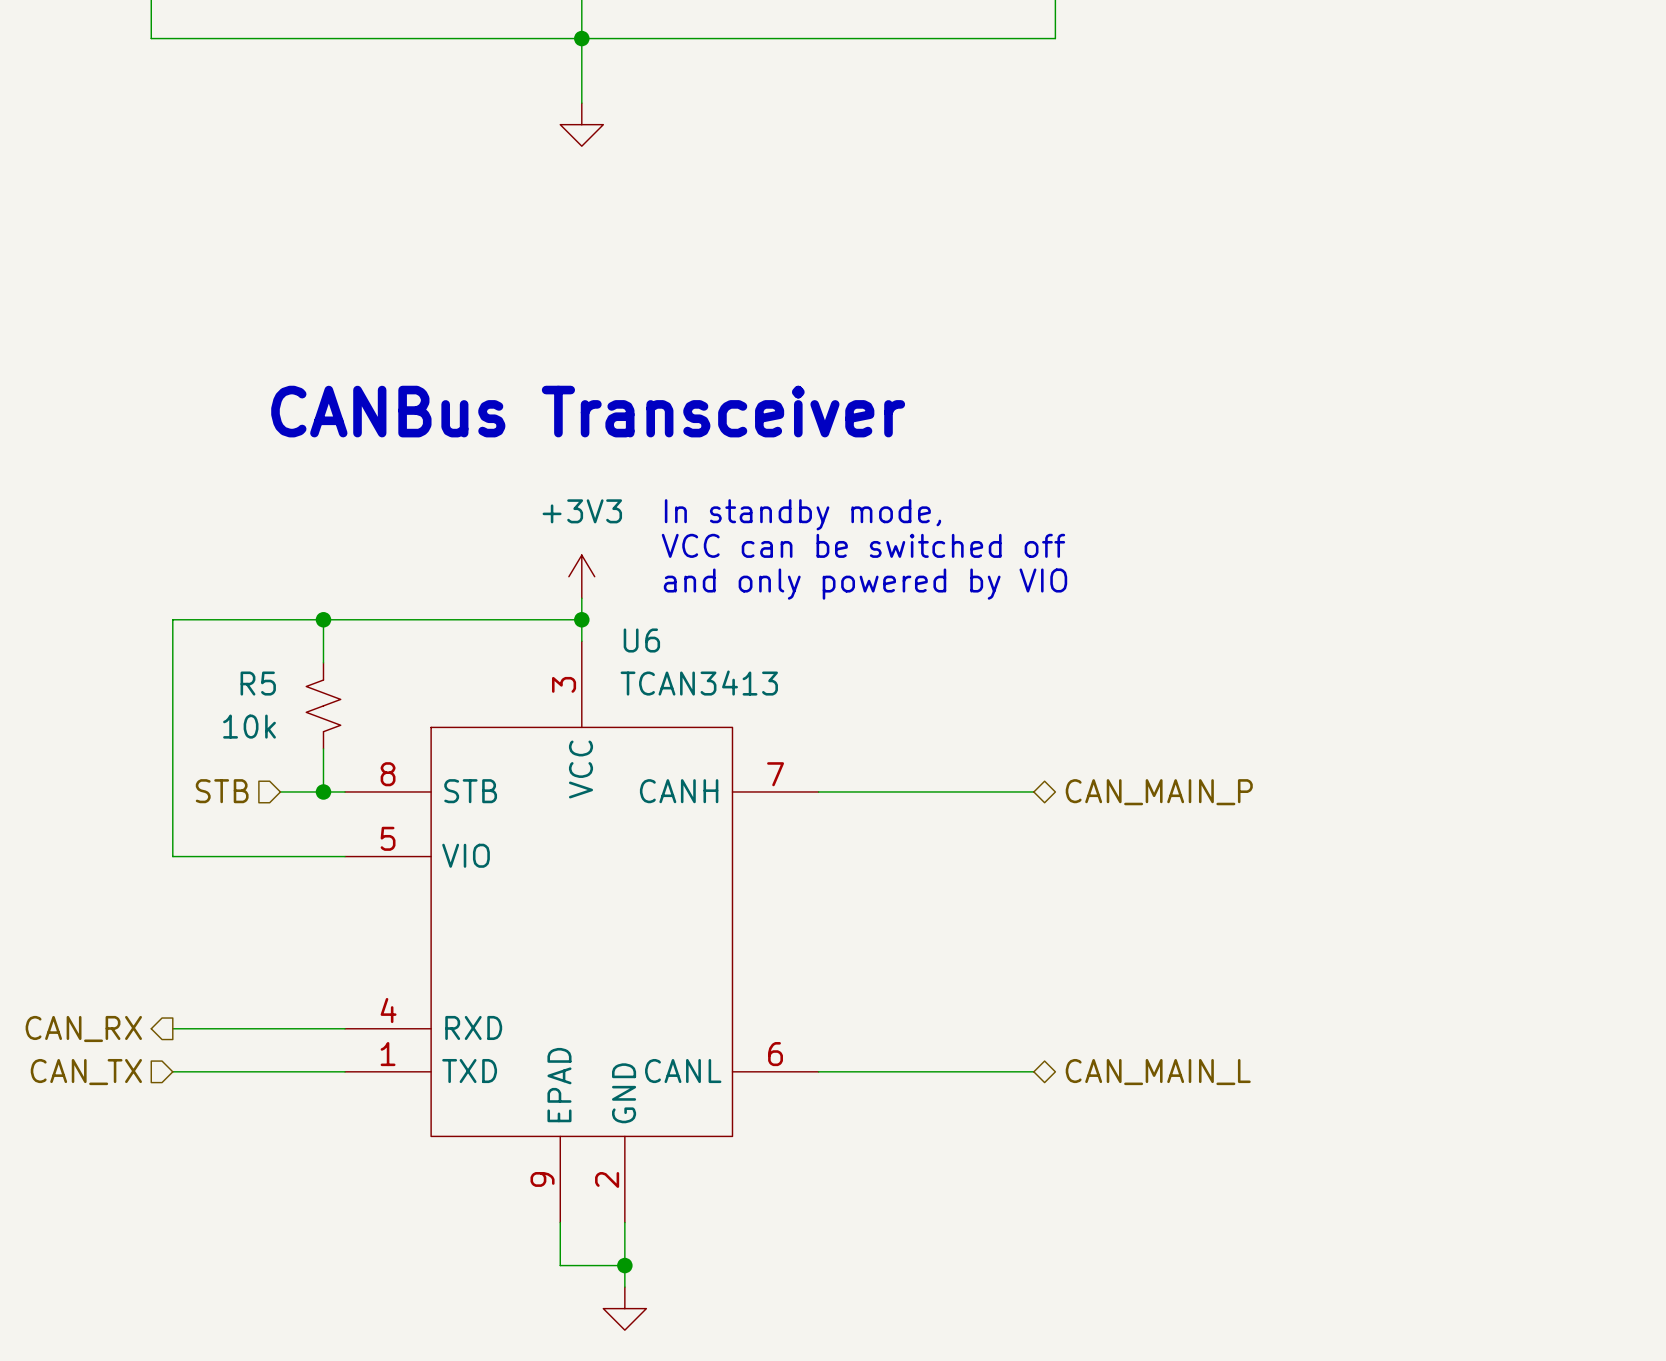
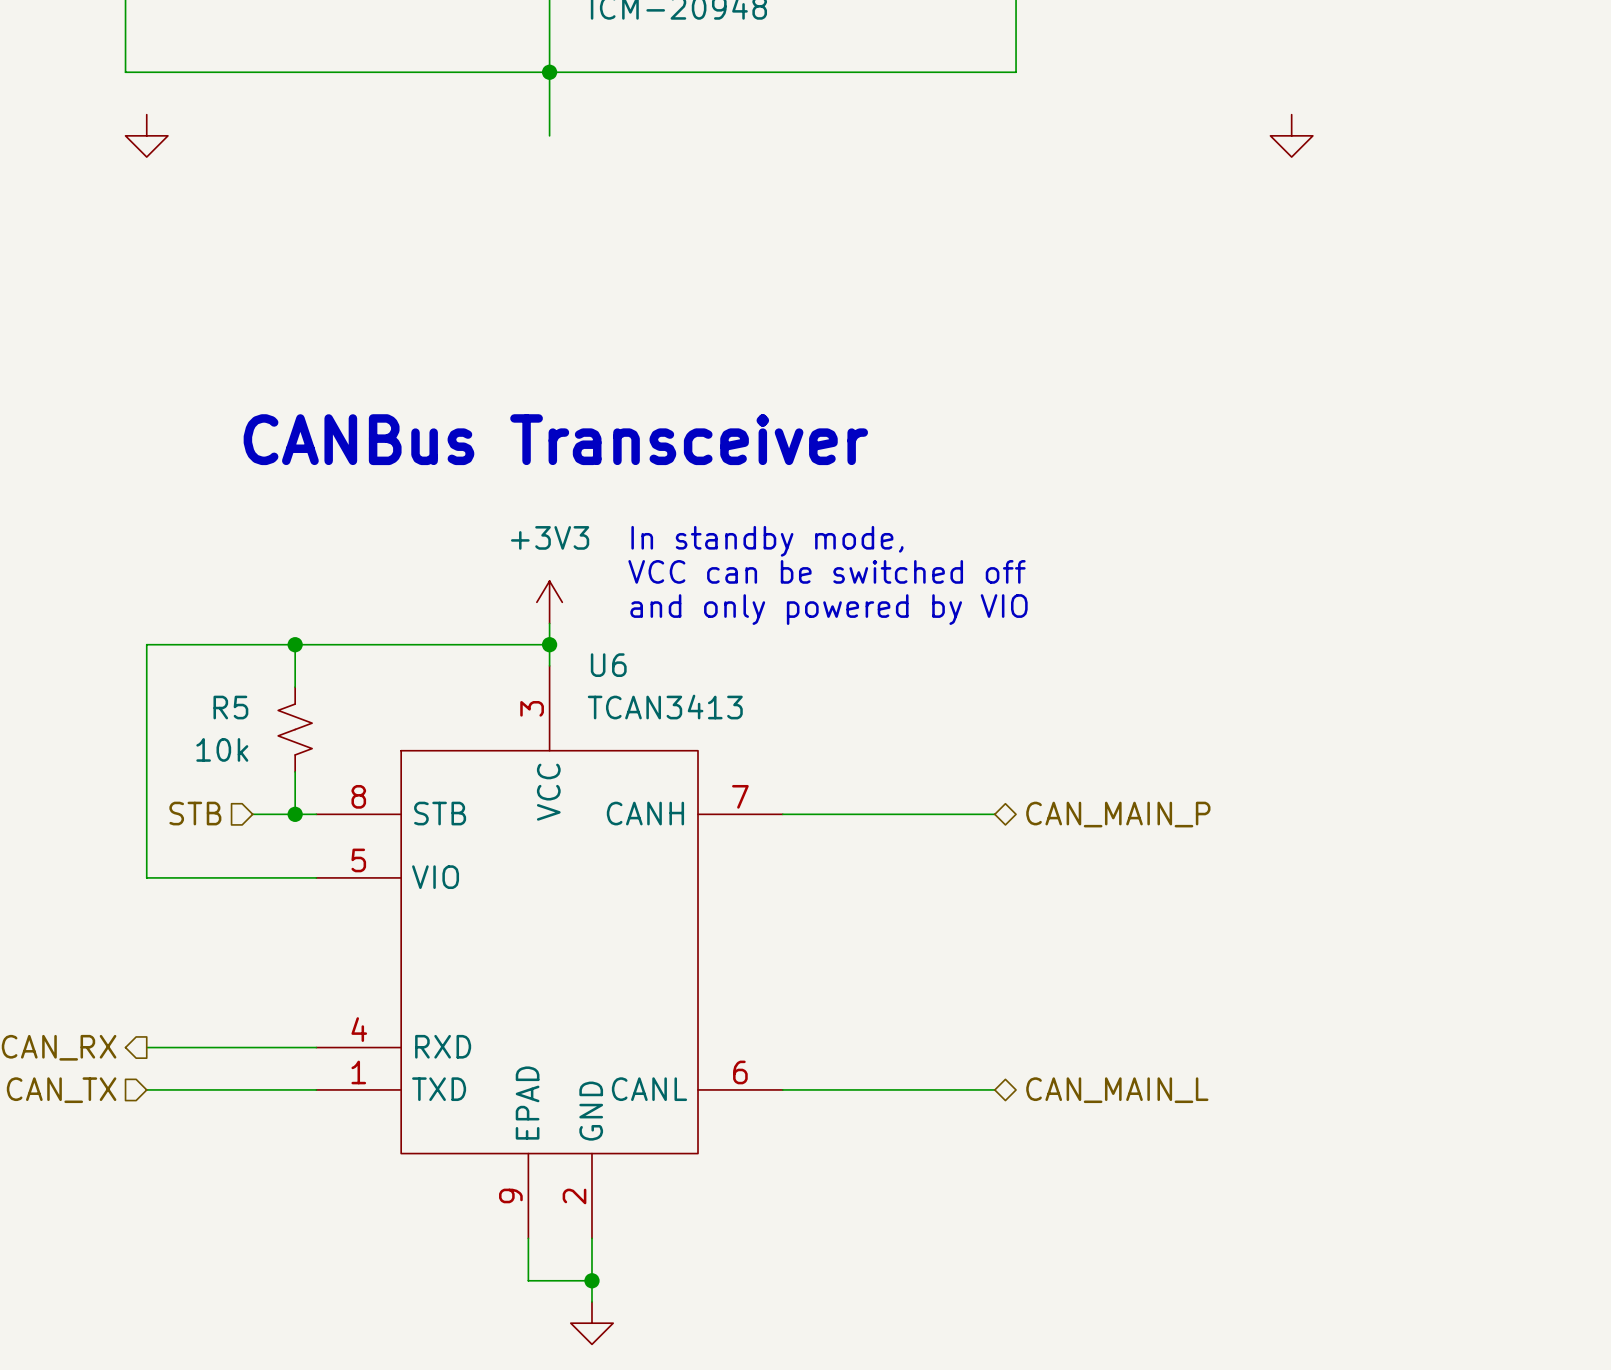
power symbol: none -> (146, 135)
power symbol: none -> (1291, 135)
power symbol: (581, 124) -> none

